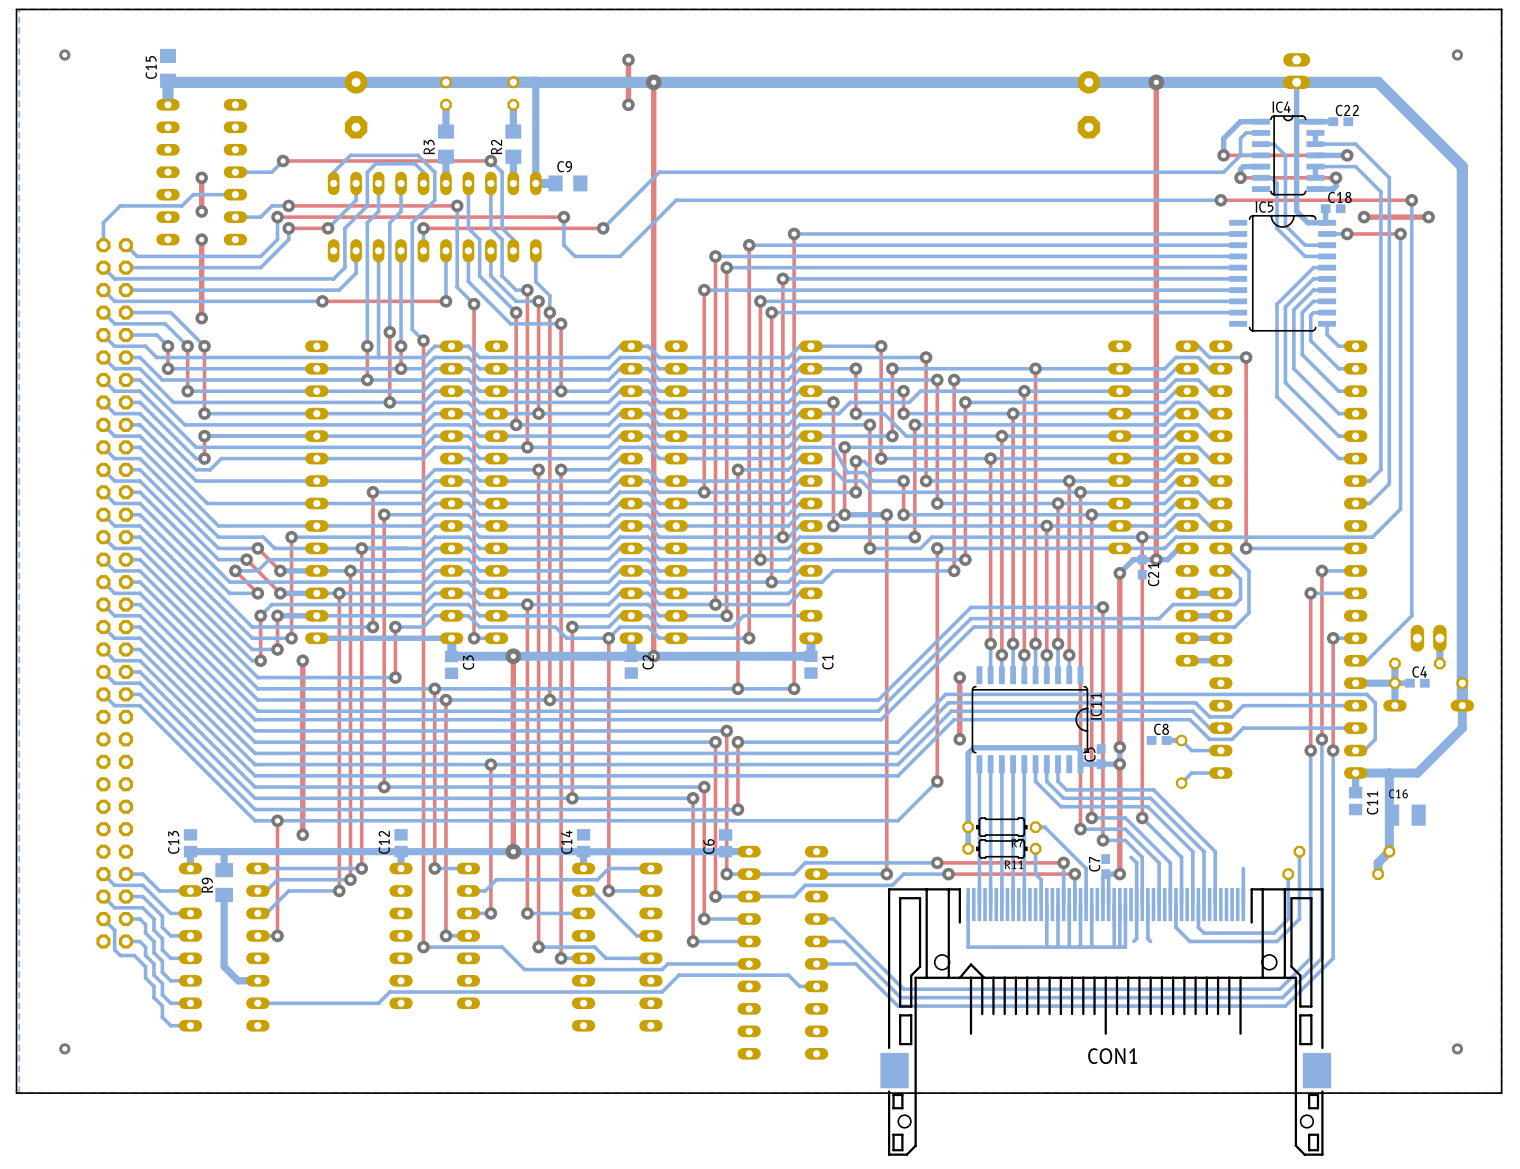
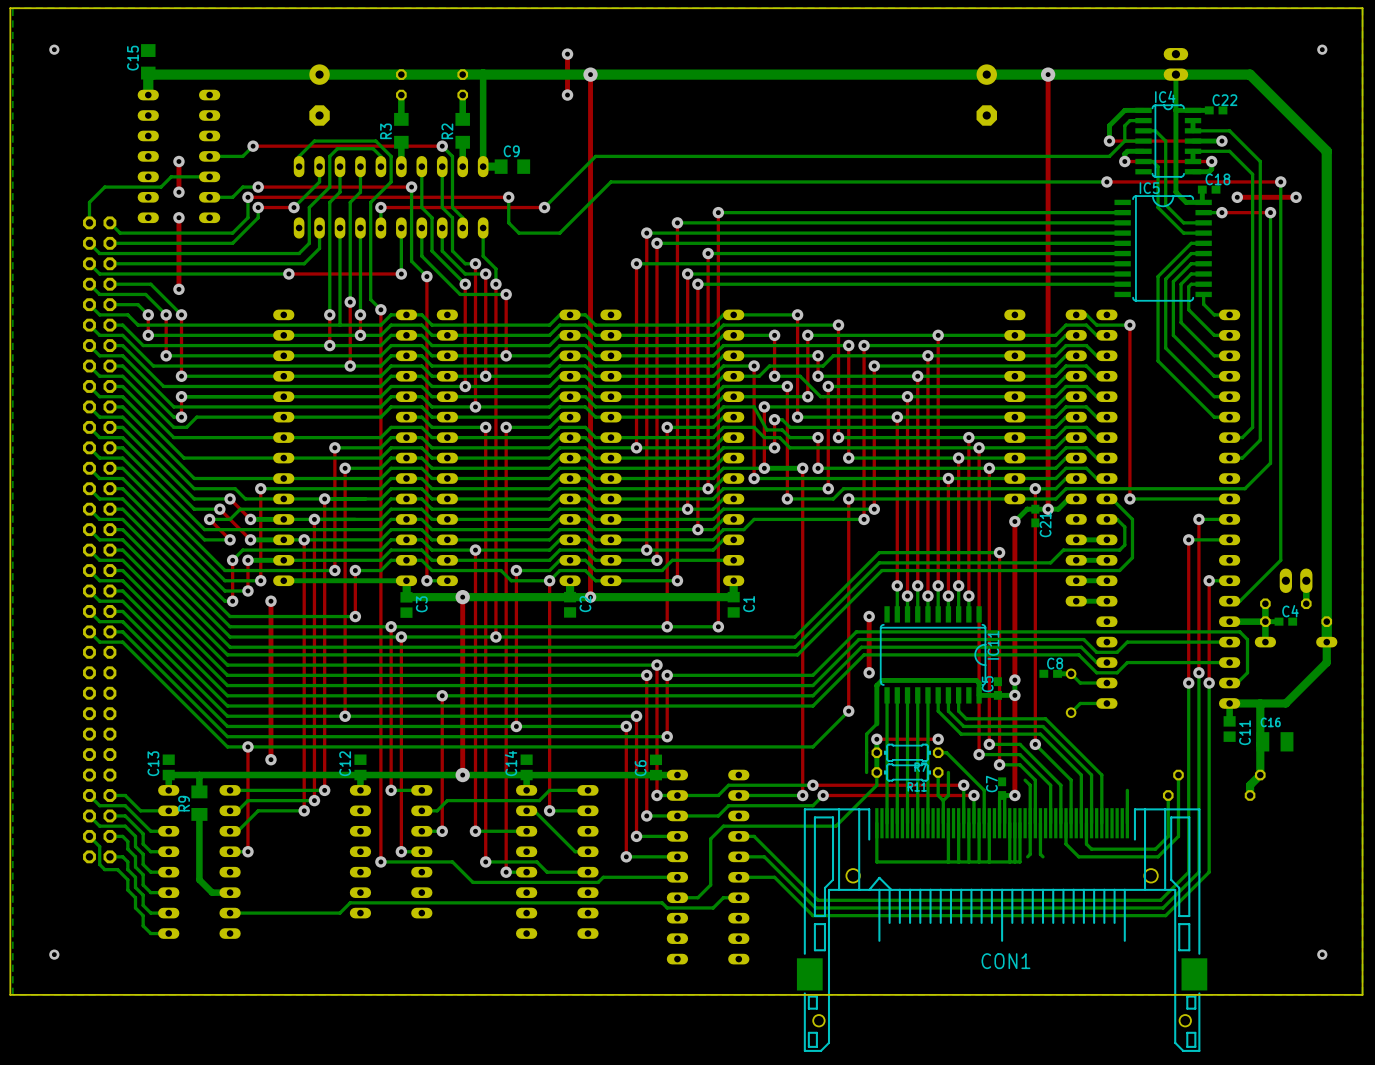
bottom track: (968, 795) (968, 812) -> (876, 723) (866, 734) (866, 772)
via: none -> (876, 739)
top track: none -> (938, 739) (876, 739)
via: none -> (938, 739)
bottom track: none -> (876, 772) (876, 785) (835, 826) (723, 826) (710, 838) (710, 884) (697, 897) (677, 897)
bottom track: none -> (948, 772) (948, 795) (943, 800)
via: none -> (812, 785)
bottom track: (937, 862) (897, 862) -> none
top track: none -> (848, 785) (812, 785)
via: (937, 862) -> none
via: none -> (823, 795)
bottom track: (948, 874) (903, 874) (892, 885) -> (823, 795) (812, 805) (807, 805)
top track: none -> (858, 795) (823, 795)
via: (948, 874) -> none
bottom track: (799, 986) (788, 975) (679, 975) (662, 992) -> (723, 897) (713, 907) (667, 907) (662, 902) (598, 902)

